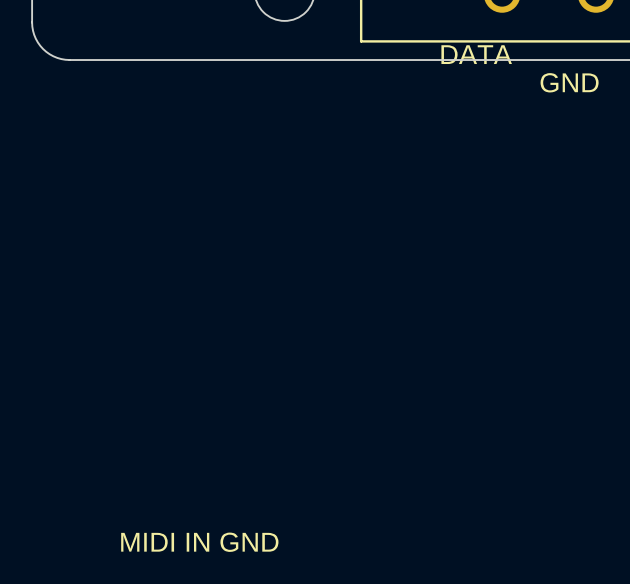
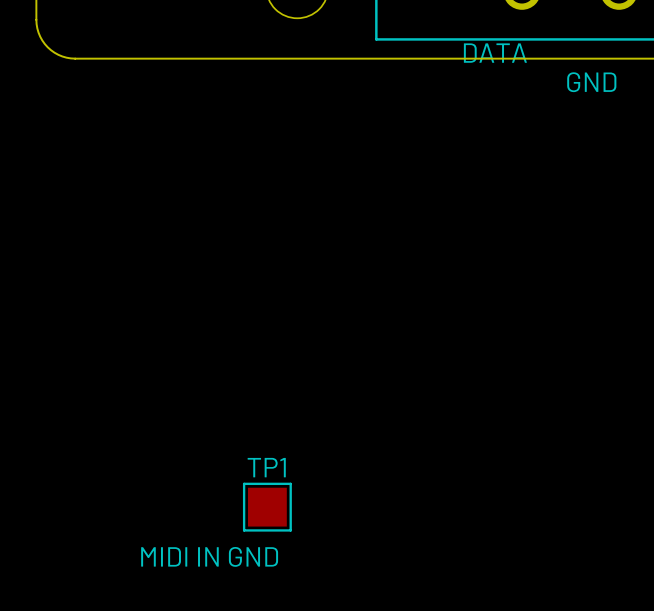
TP1: none -> (267, 507)

